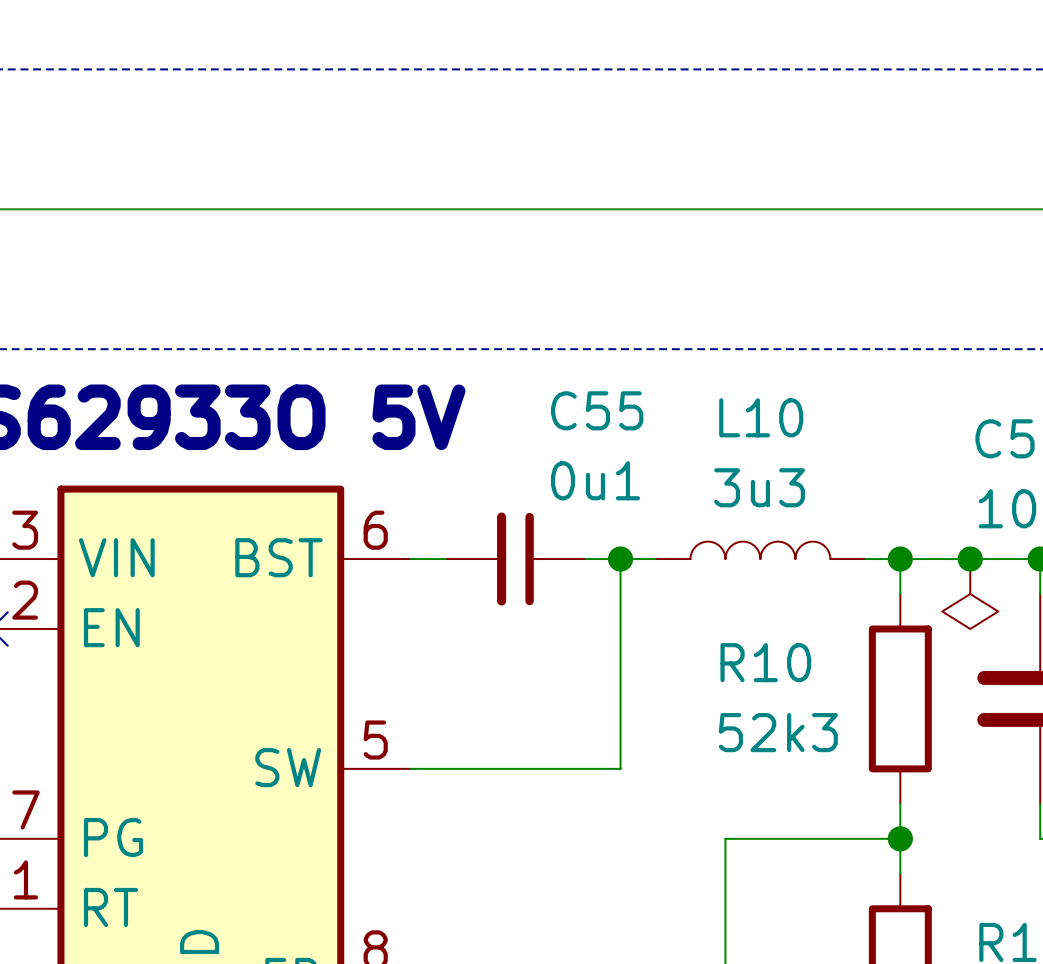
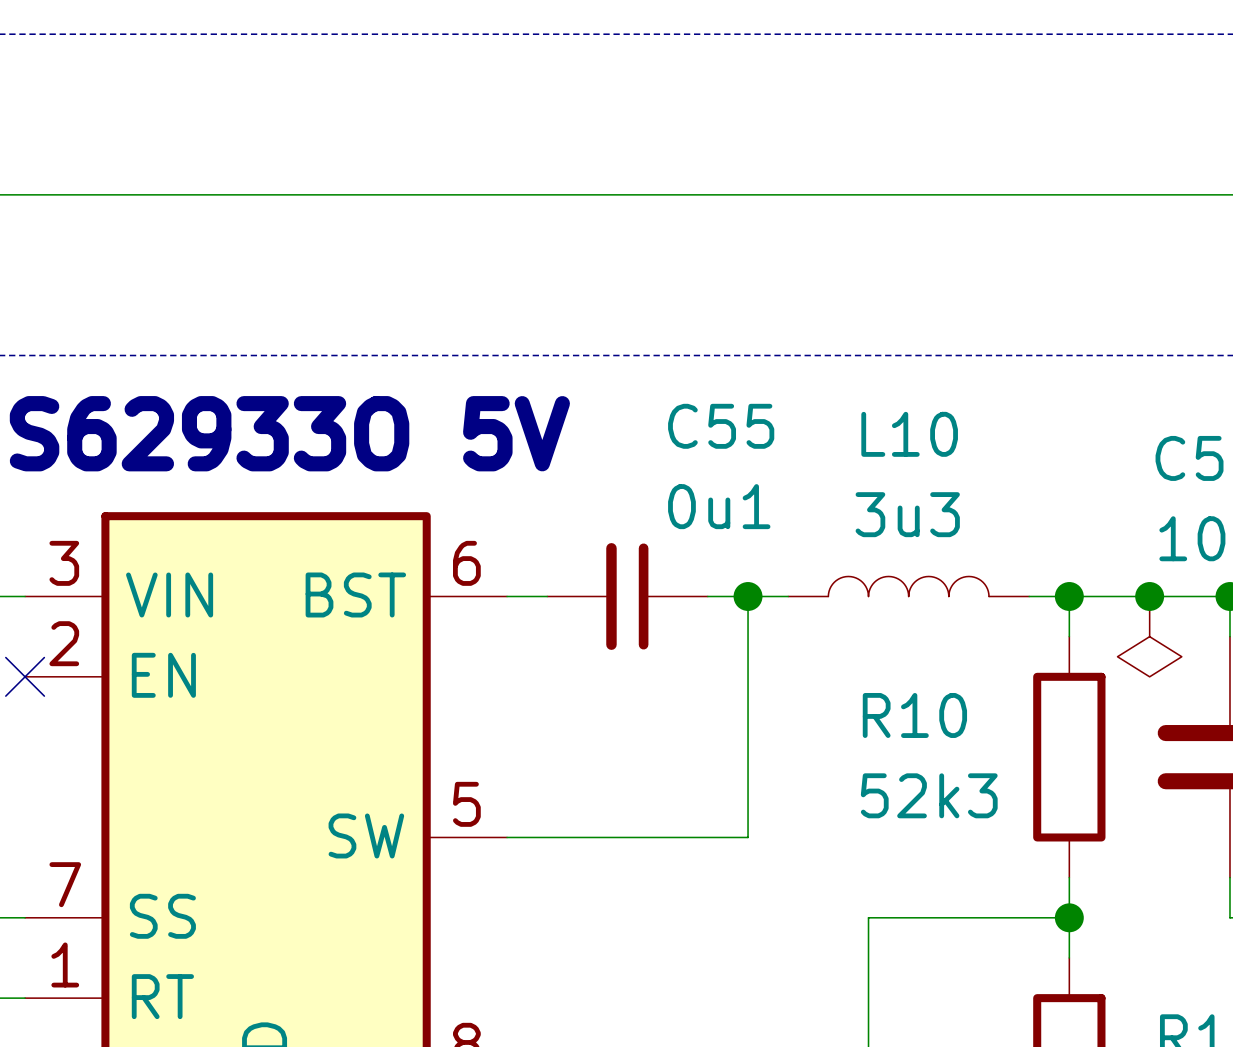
part pin name: PG (113, 837) -> SS (162, 916)

